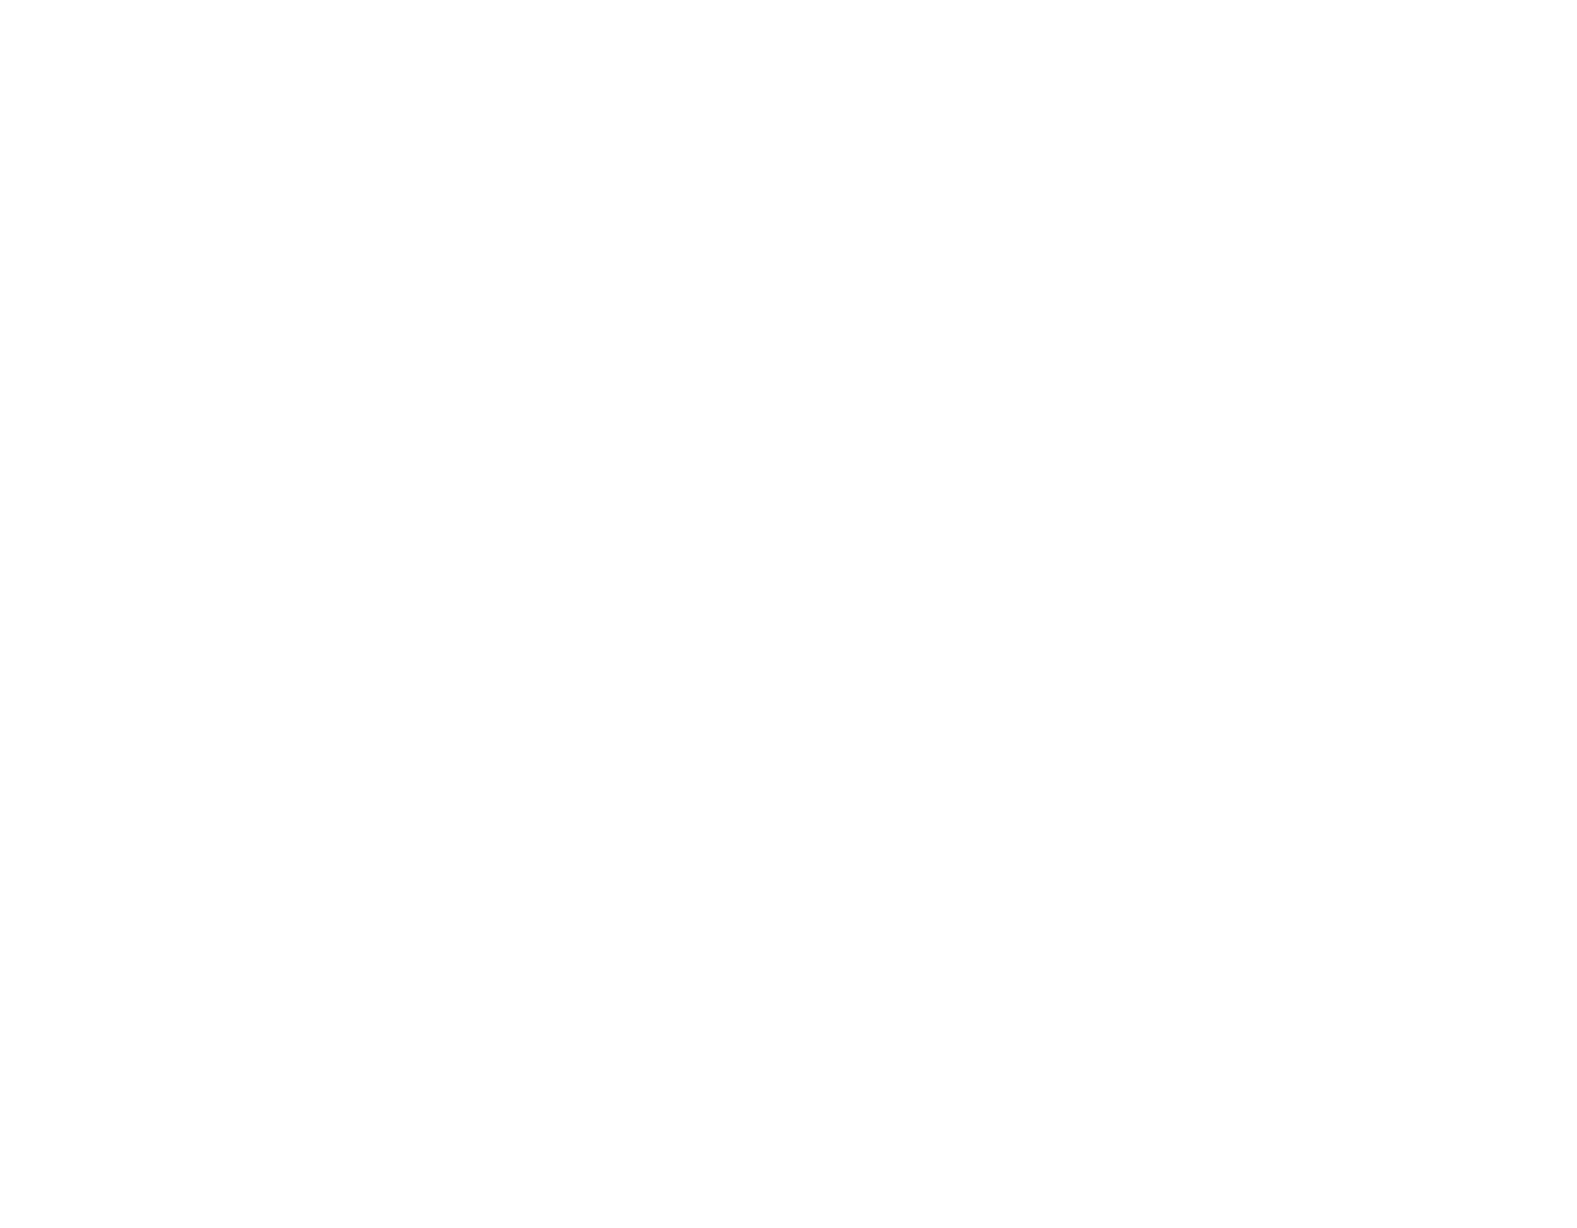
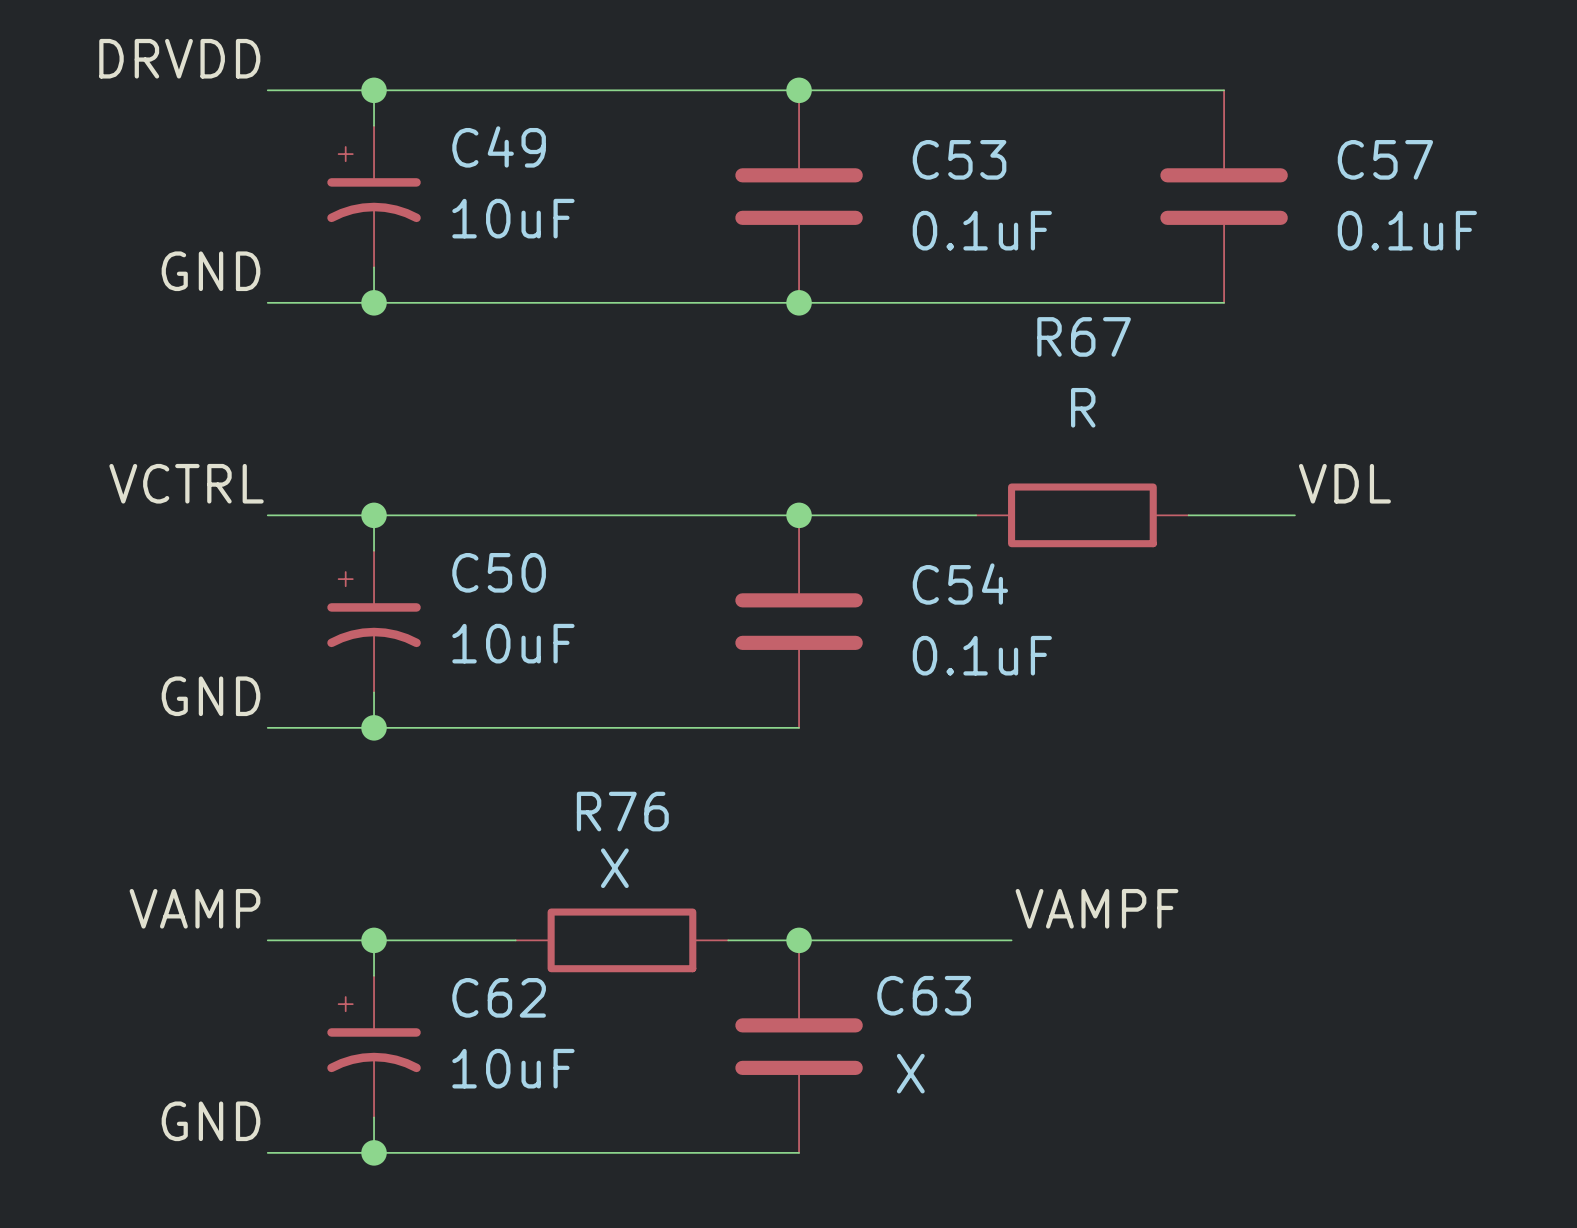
label: none -> DRVDD (179, 58)
wire: none -> (267, 90) (1224, 90)
wire: none -> (374, 90) (374, 125)
junction: none -> (374, 90)
junction: none -> (799, 90)
C49: none -> 10uF (374, 196)
C53: none -> 0.1uF (799, 196)
C57: none -> 0.1uF (1224, 196)
wire: none -> (374, 267) (374, 302)
label: none -> GND (211, 271)
wire: none -> (267, 302) (1224, 302)
junction: none -> (374, 302)
junction: none -> (799, 302)
label: none -> VCTRL (186, 483)
label: none -> VDL (1344, 483)
wire: none -> (267, 515) (976, 515)
wire: none -> (374, 515) (374, 550)
junction: none -> (374, 515)
junction: none -> (799, 515)
R67: none -> R (1082, 515)
wire: none -> (1188, 515) (1294, 515)
C50: none -> 10uF (374, 621)
C54: none -> 0.1uF (799, 621)
wire: none -> (374, 692) (374, 727)
label: none -> GND (211, 696)
wire: none -> (267, 727) (799, 727)
junction: none -> (374, 727)
label: none -> VAMP (194, 908)
label: none -> VAMPF (1097, 908)
wire: none -> (267, 940) (515, 940)
wire: none -> (374, 940) (374, 975)
junction: none -> (374, 940)
R76: none -> X (621, 940)
wire: none -> (728, 940) (1011, 940)
junction: none -> (799, 940)
C62: none -> 10uF (374, 1046)
C63: none -> X (799, 1046)
wire: none -> (374, 1117) (374, 1152)
label: none -> GND (211, 1121)
wire: none -> (267, 1152) (799, 1152)
junction: none -> (374, 1152)

